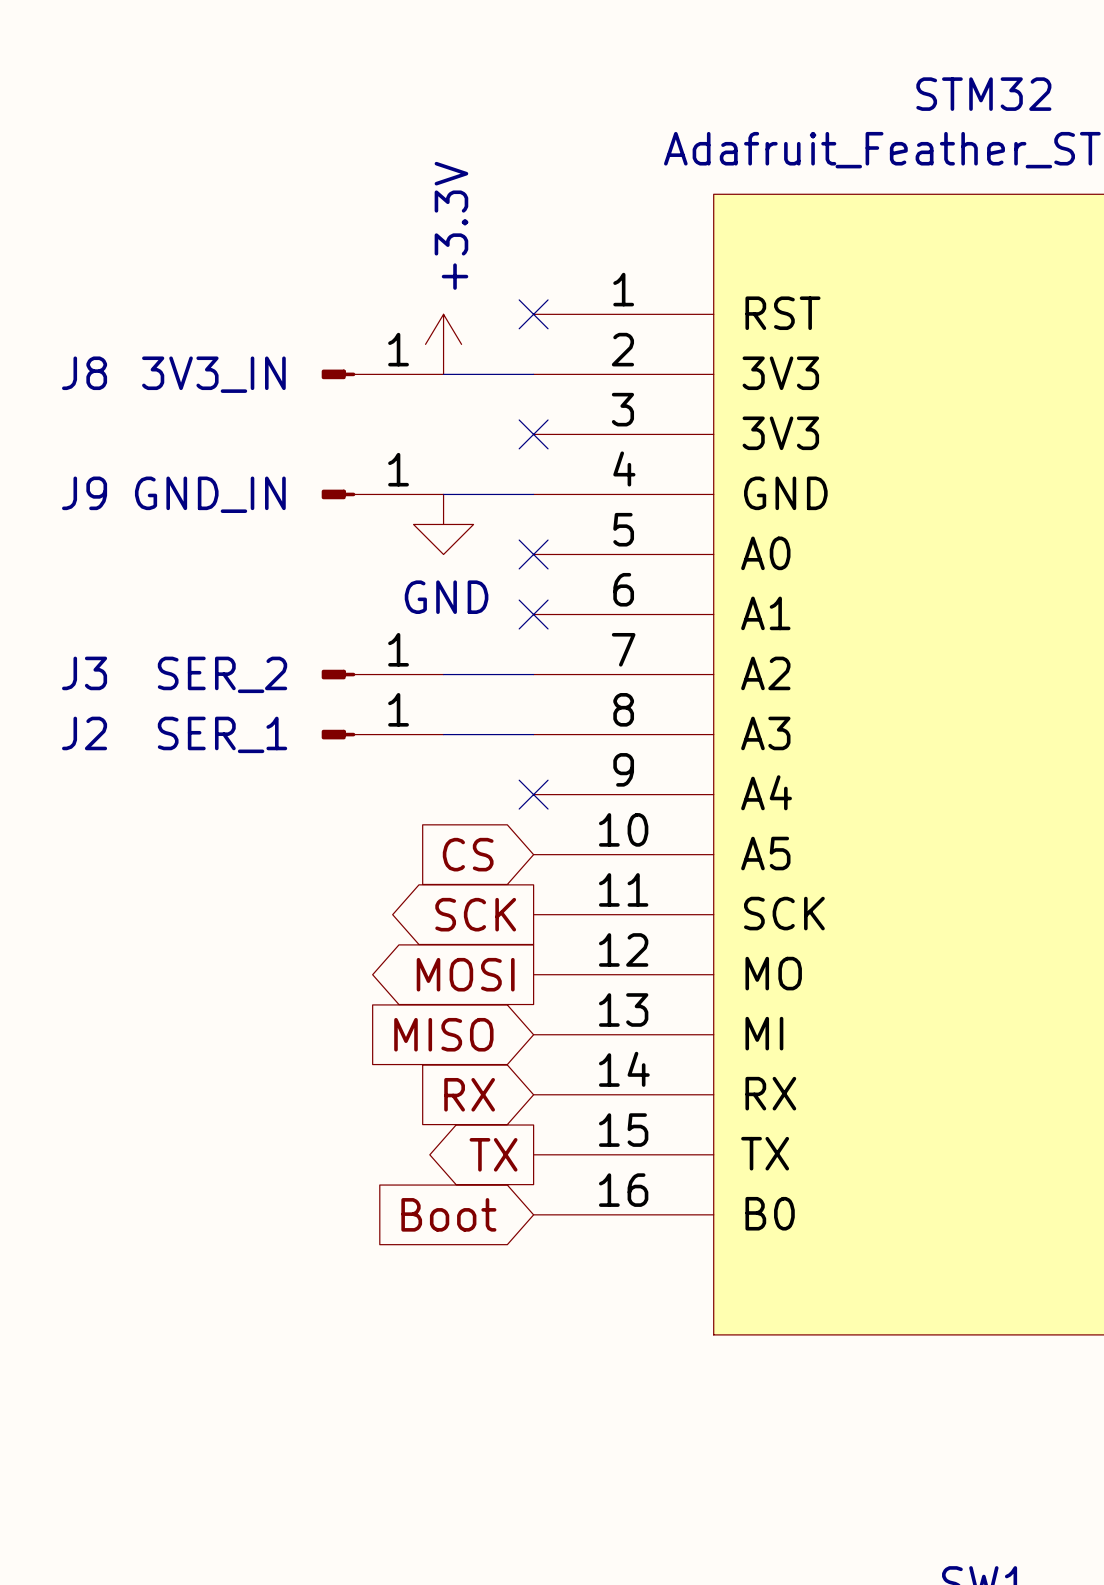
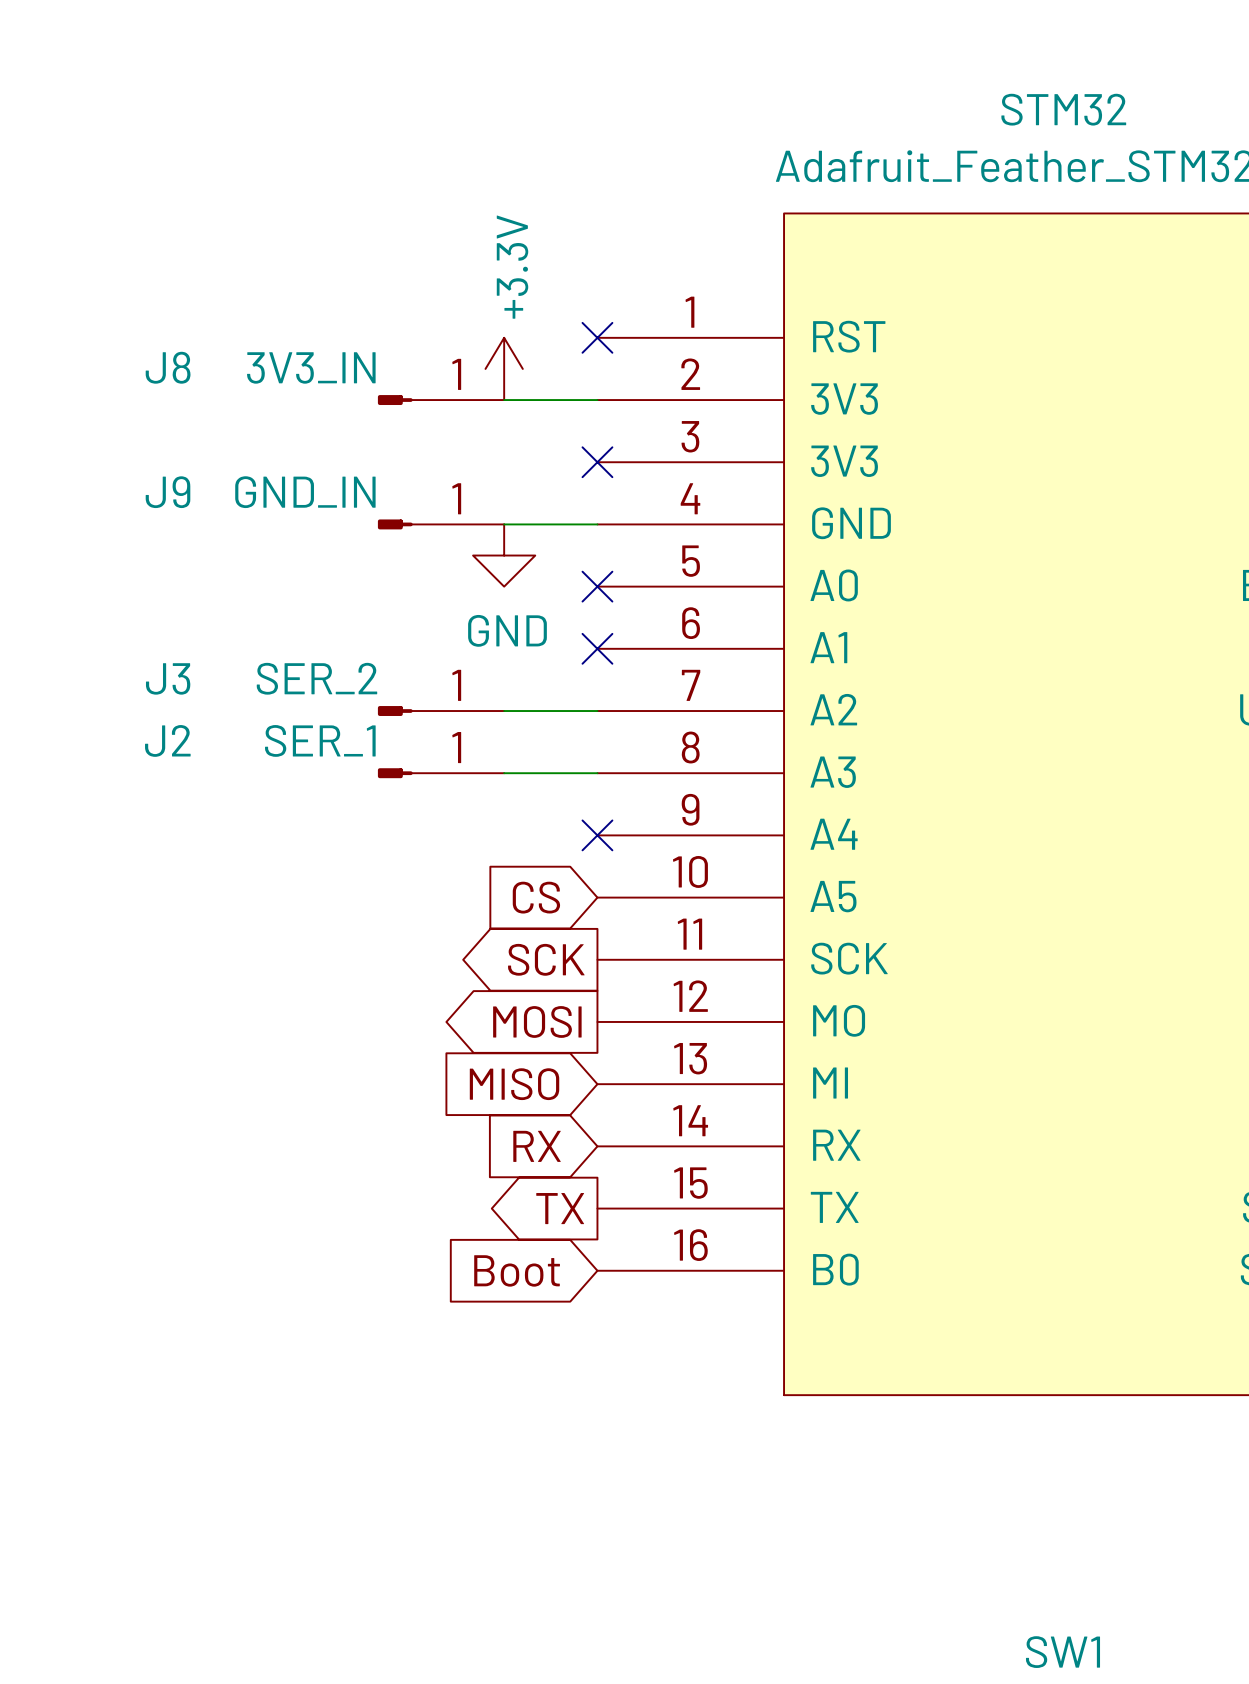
J8 name position: J8 (84, 373) -> J8 (168, 367)
J8 value position: 3V3_IN (213, 374) -> 3V3_IN (311, 367)
J9 name position: J9 (84, 493) -> J9 (168, 492)
J9 value position: GND_IN (210, 494) -> GND_IN (305, 492)
J3 name position: J3 (84, 673) -> J3 (168, 678)
J3 value position: SER_2 (222, 674) -> SER_2 (316, 678)
J2 name position: J2 (84, 733) -> J2 (167, 740)
J2 value position: SER_1 (222, 734) -> SER_1 (320, 740)

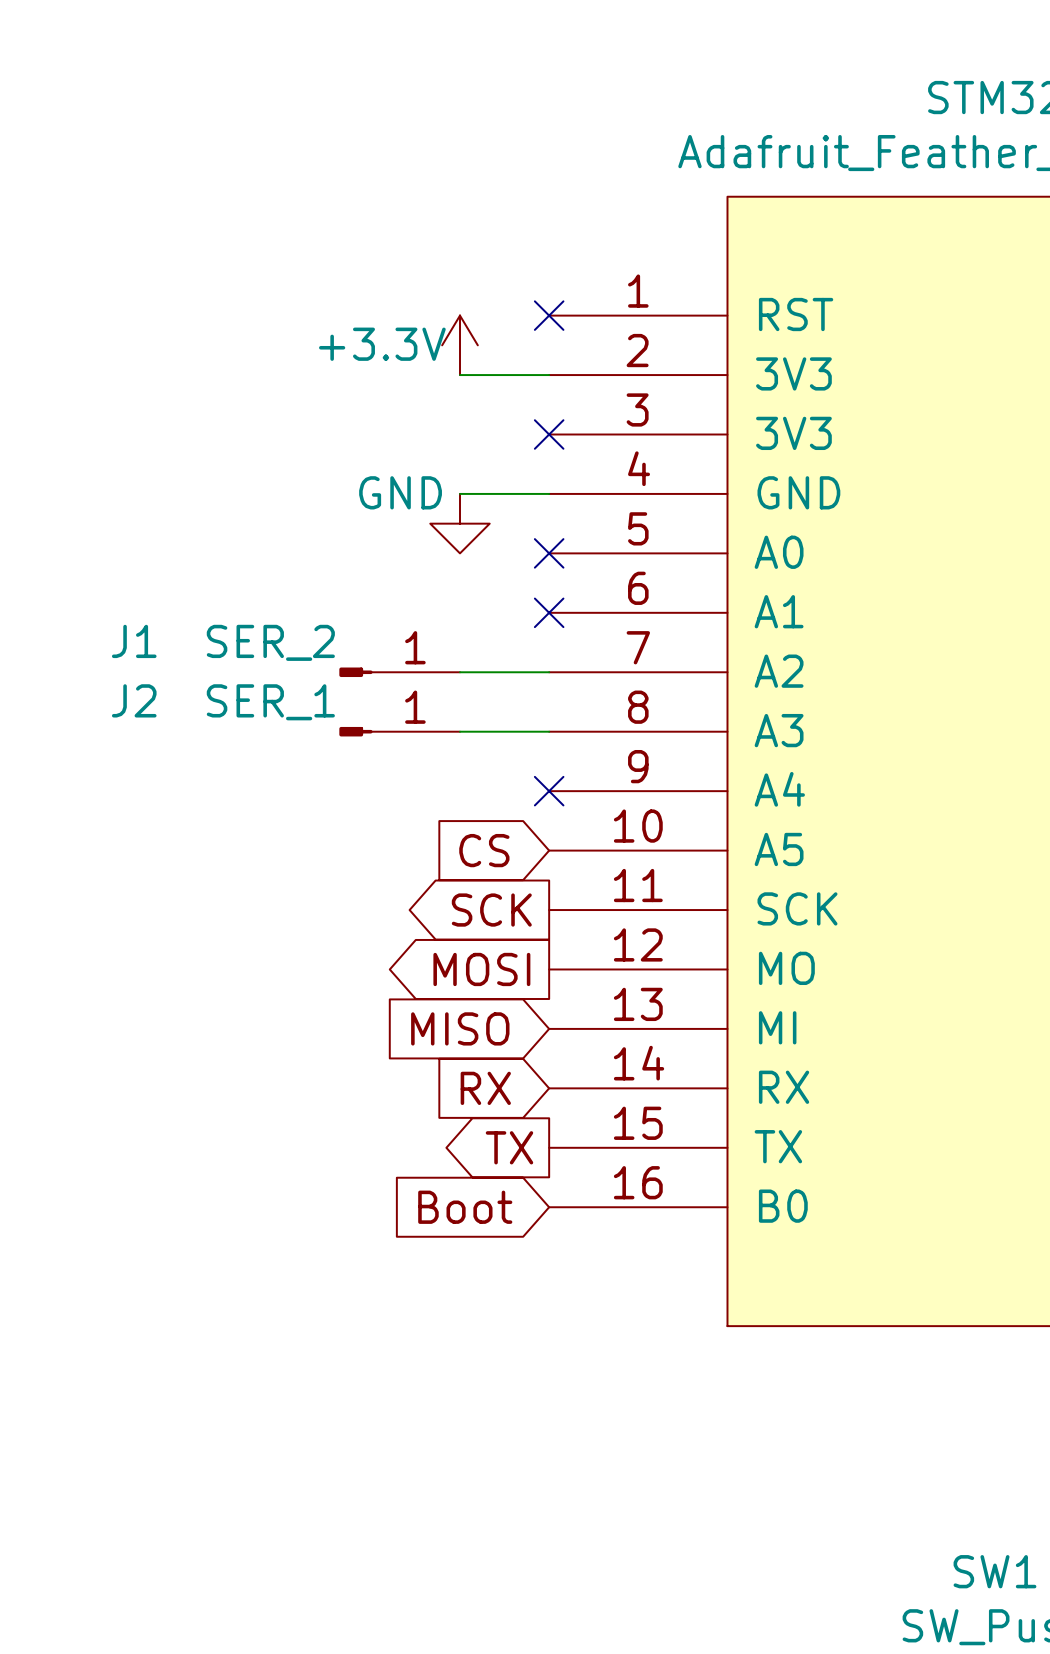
power symbol text rotation: 0° (512, 267) -> 90° clockwise (382, 344)
J8: 3V3_IN (441, 400) -> none
J9: GND_IN (441, 524) -> none
power symbol text position: GND (507, 630) -> GND (400, 492)
J3 name: J3 (168, 678) -> J1 (134, 641)

